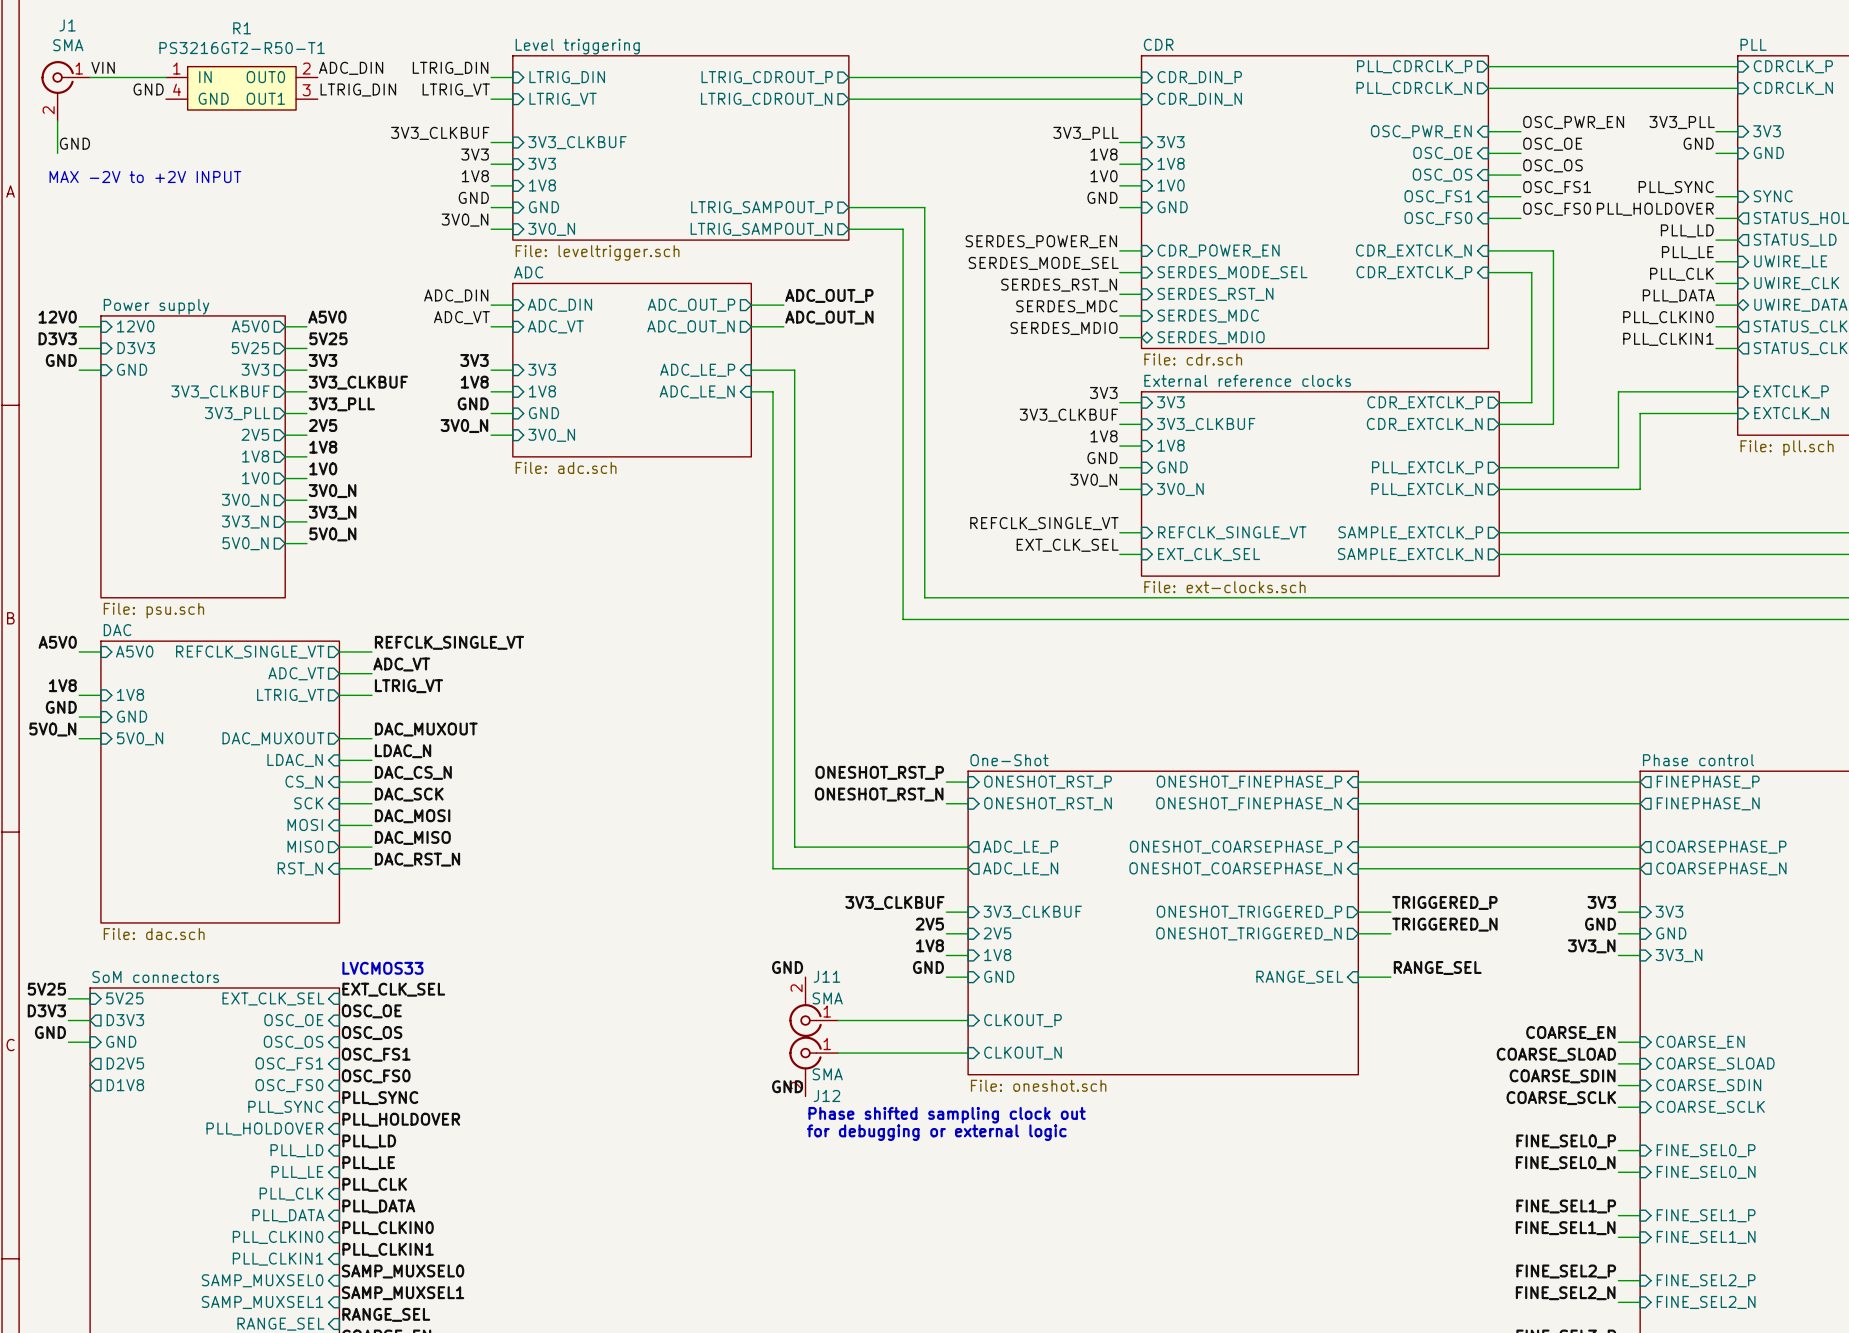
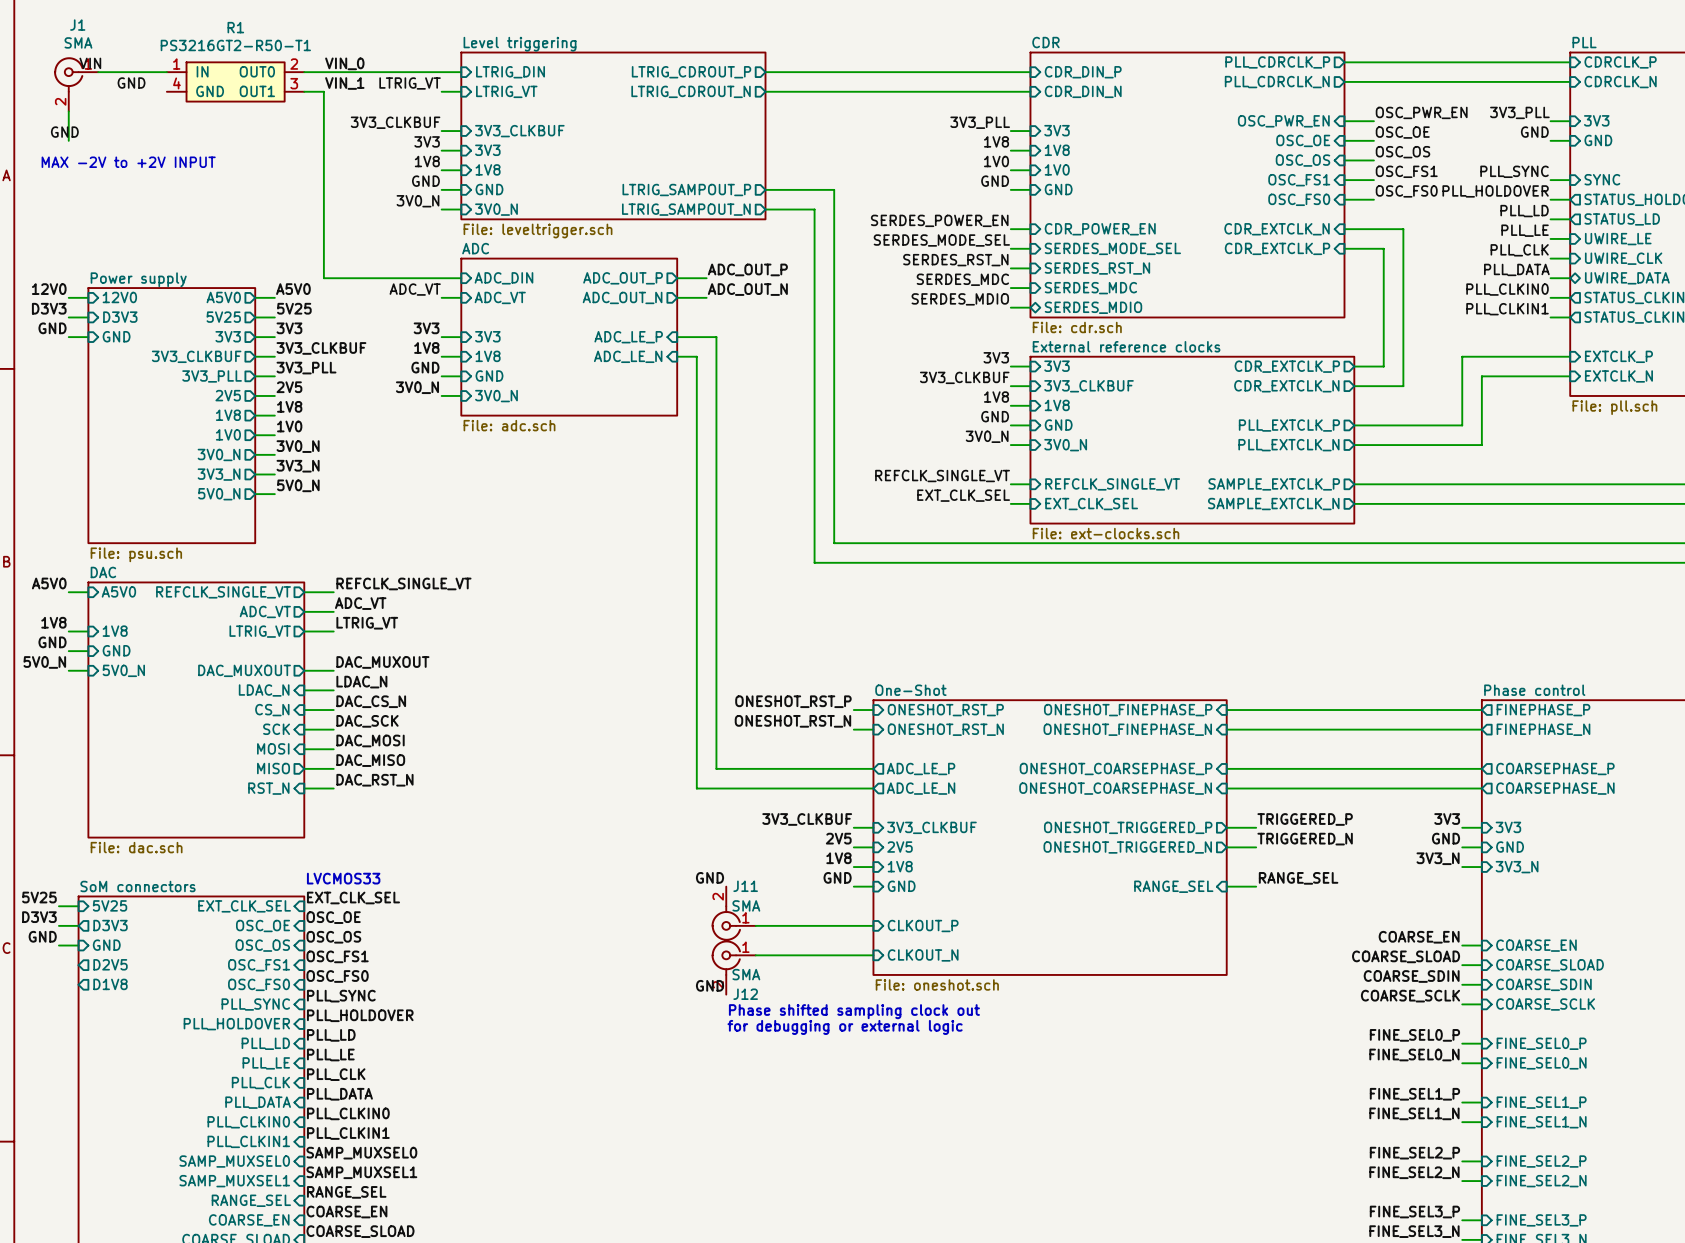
label: ADC_DIN (351, 68) -> none
label: none -> VIN_0 (344, 63)
label: LTRIG_DIN (450, 68) -> none
wire: none -> (304, 72) (441, 72)
R1 position: (241, 88) -> (235, 81)
J1 position: (65, 90) -> (76, 84)
label: LTRIG_DIN (358, 90) -> none
label: none -> VIN_1 (344, 83)
wire: none -> (304, 91) (323, 91) (323, 278) (441, 278)
wire: (57, 120) (57, 153) -> (68, 111) (68, 140)
label: ADC_DIN (456, 295) -> none

